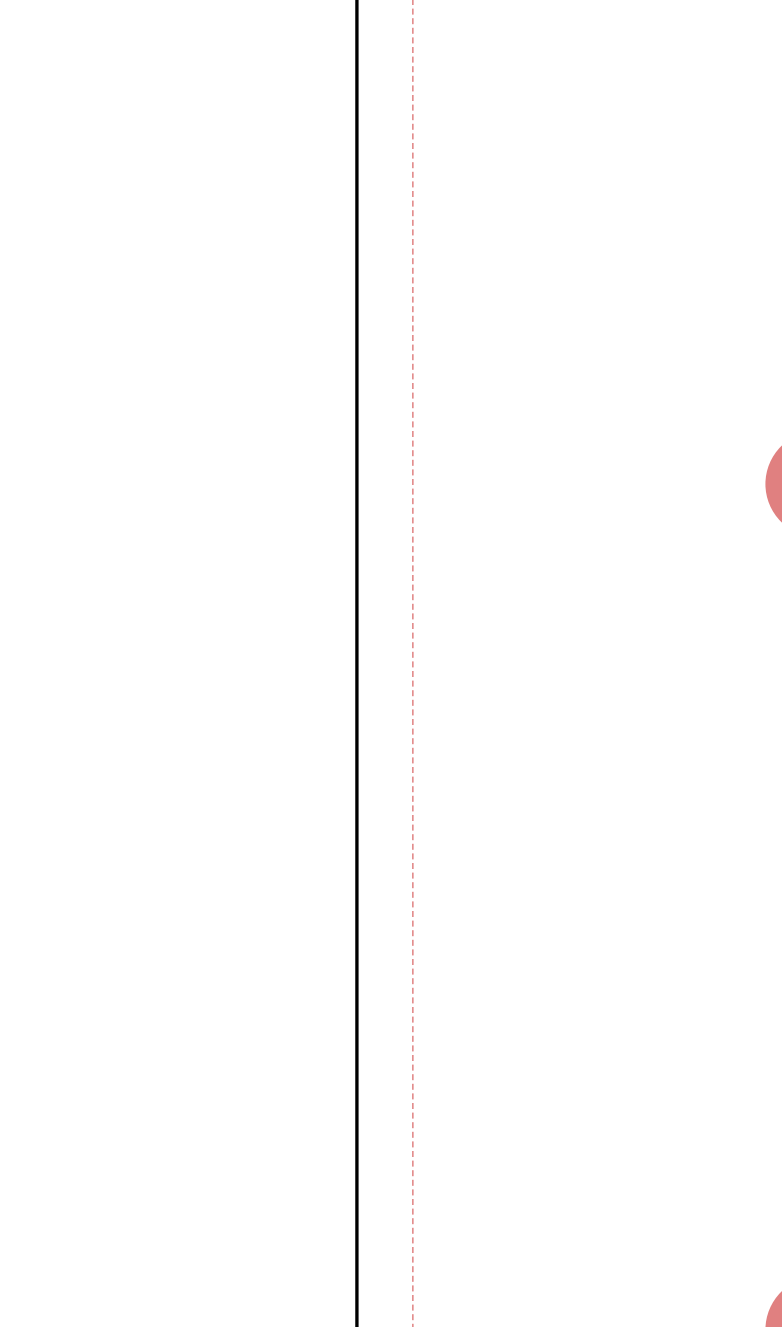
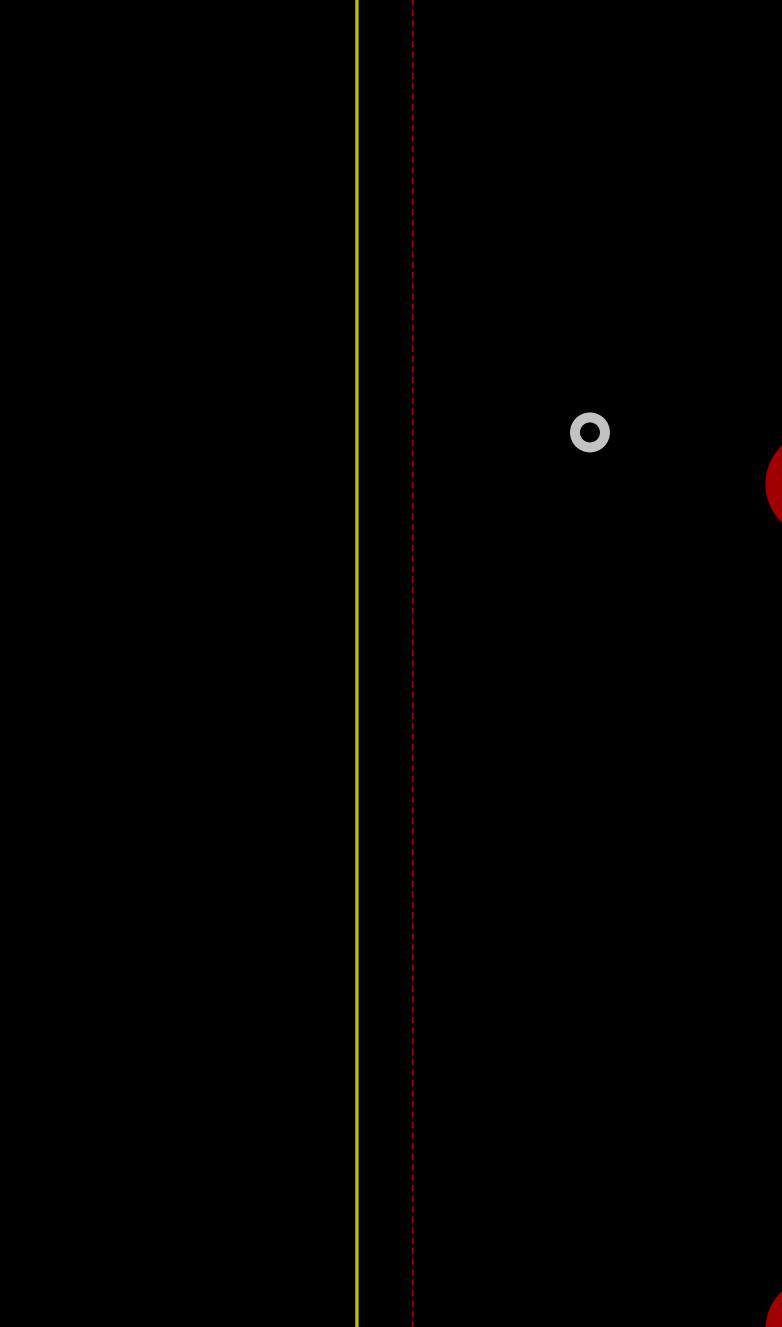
via: none -> (589, 432)

